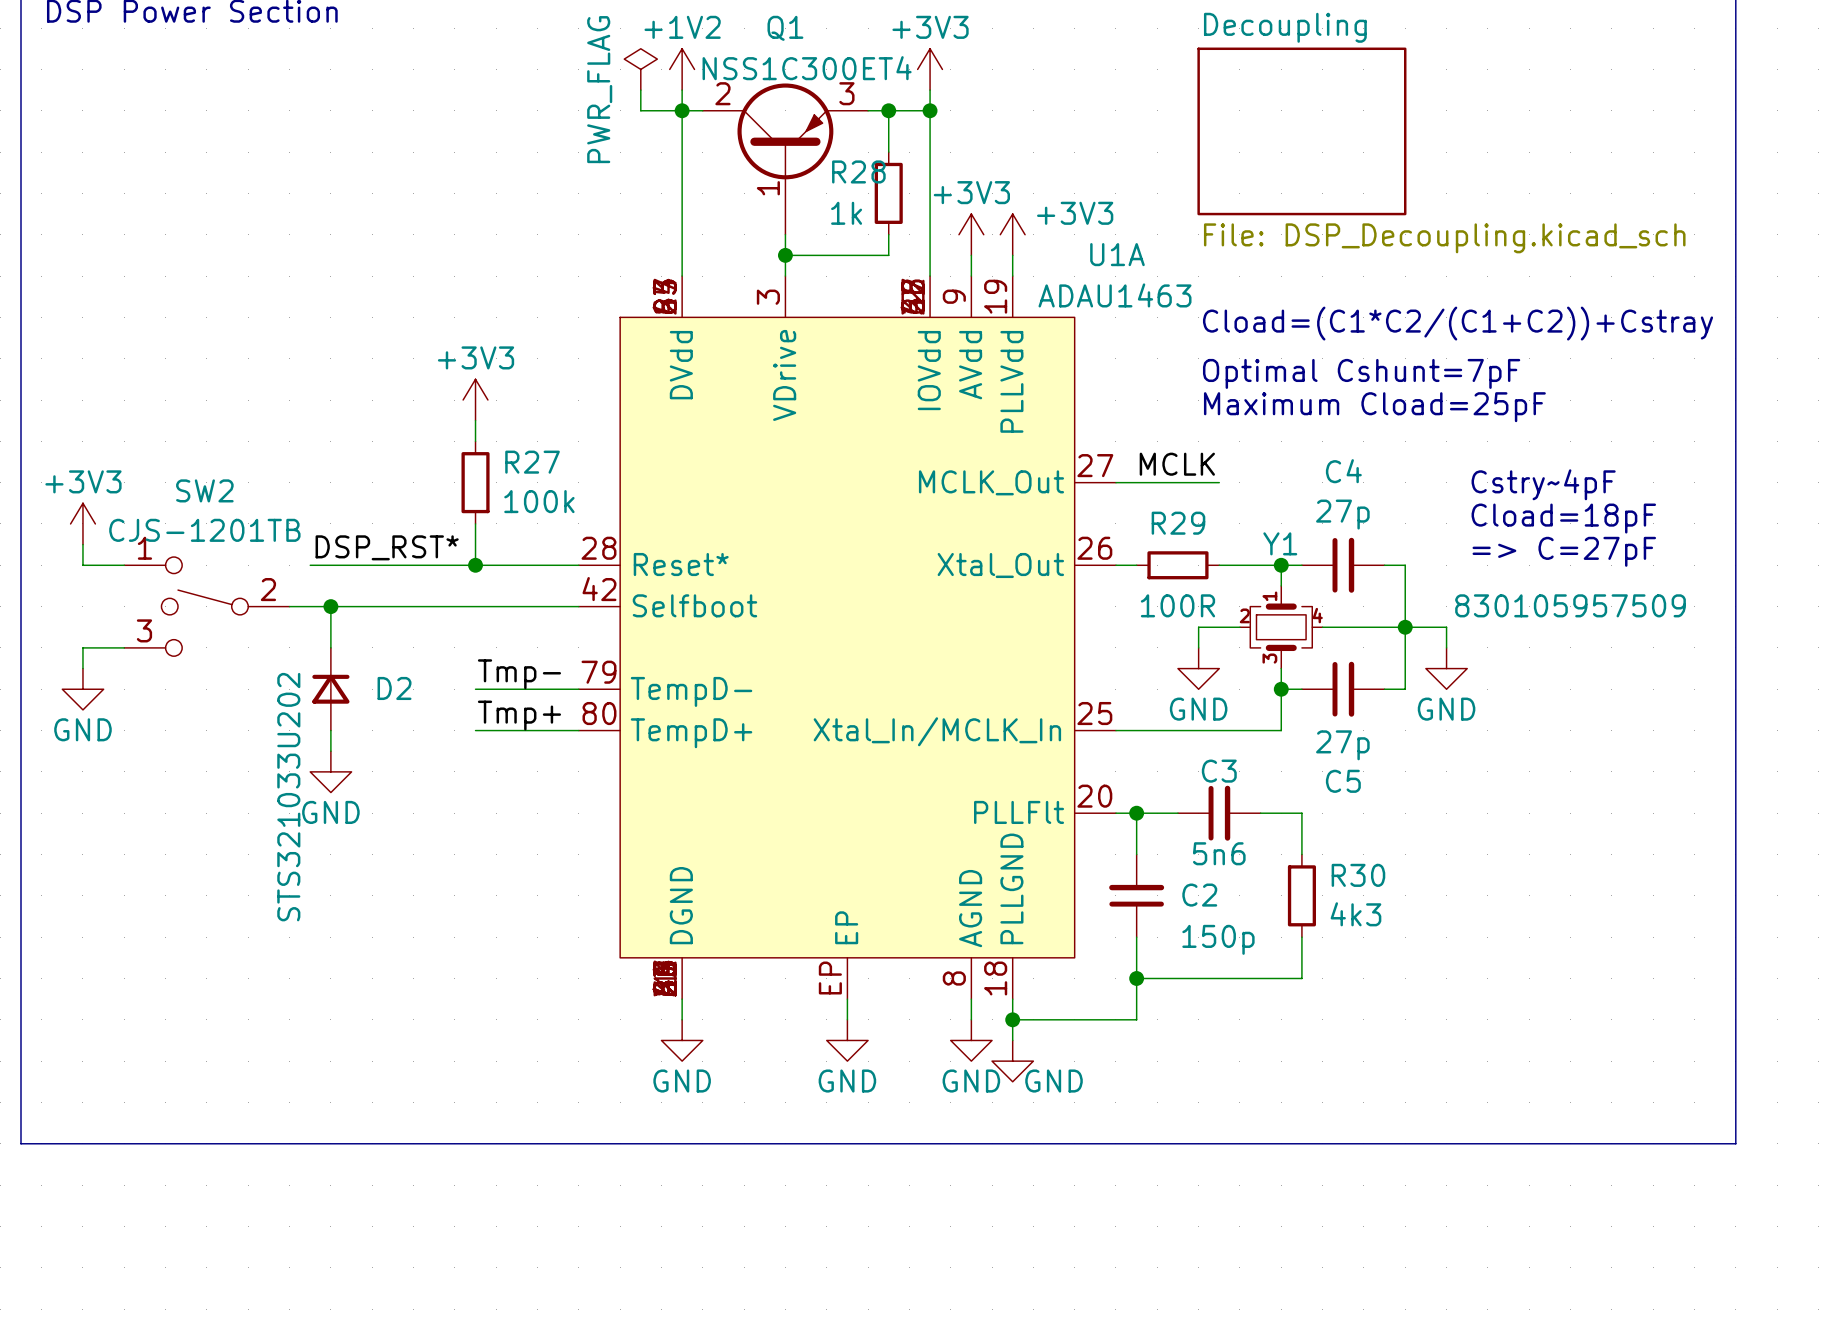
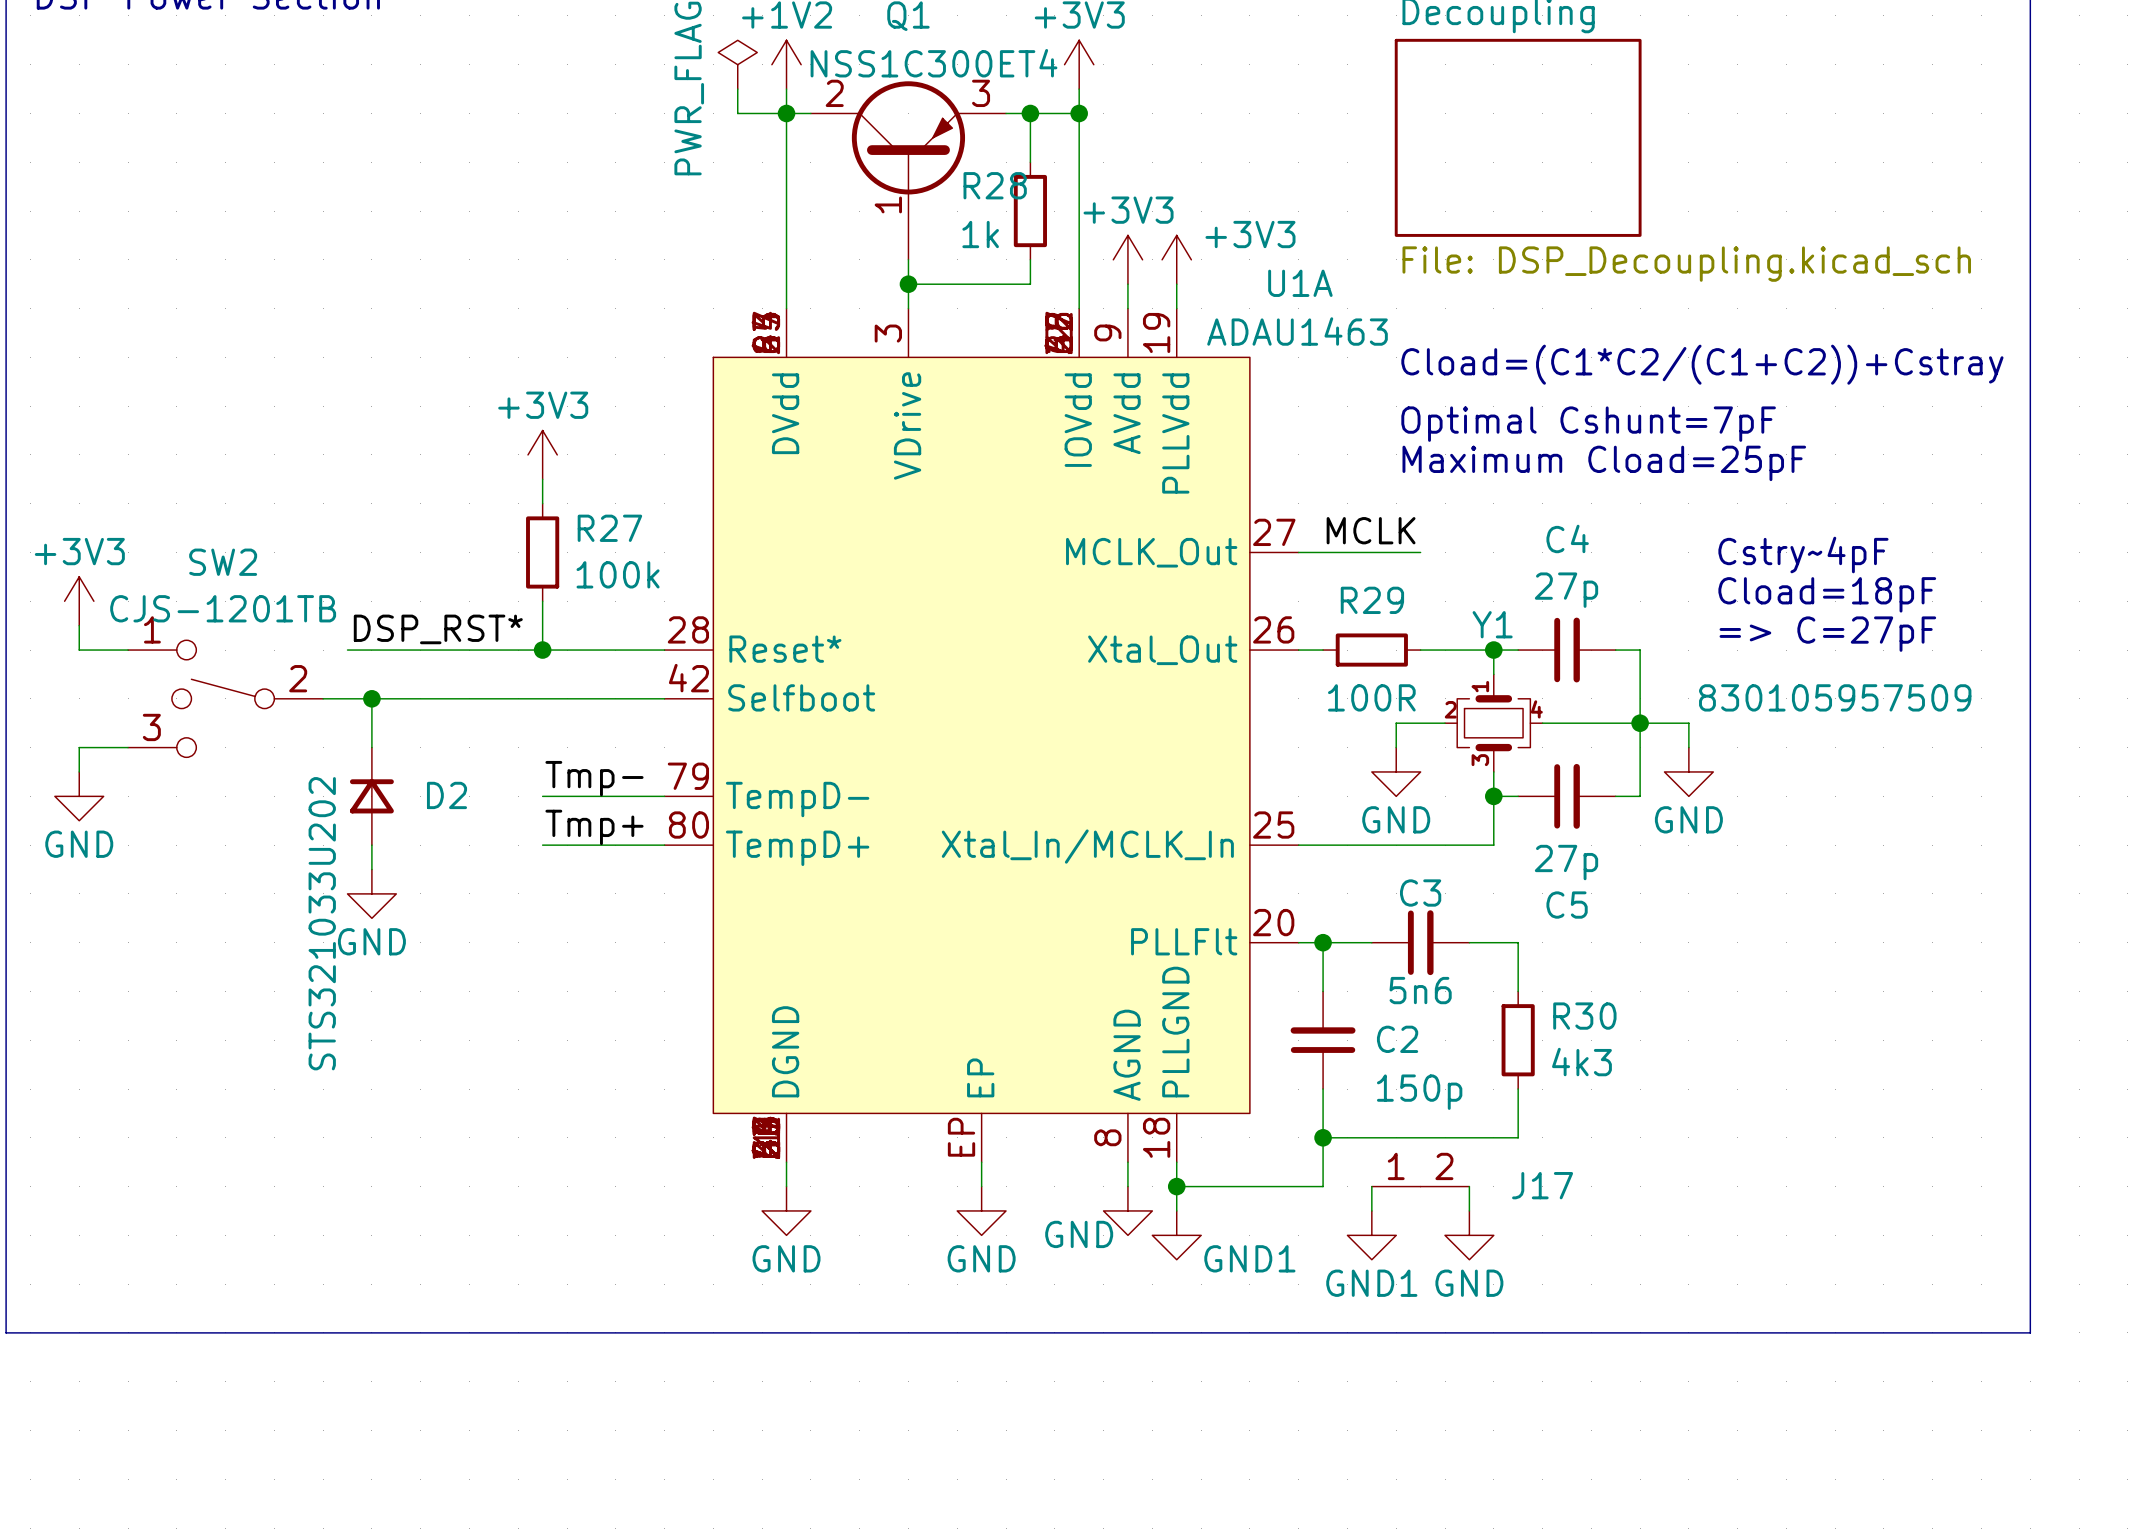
wire: none -> (1371, 1186) (1371, 1210)
J17: none -> (1420, 1186)
wire: none -> (1469, 1186) (1469, 1210)
power symbol: GND (1012, 1061) -> GND1 (1176, 1235)
power symbol: none -> GND1 (1371, 1235)
power symbol: none -> GND (1469, 1235)
power symbol text position: GND (971, 1081) -> GND (1079, 1234)

